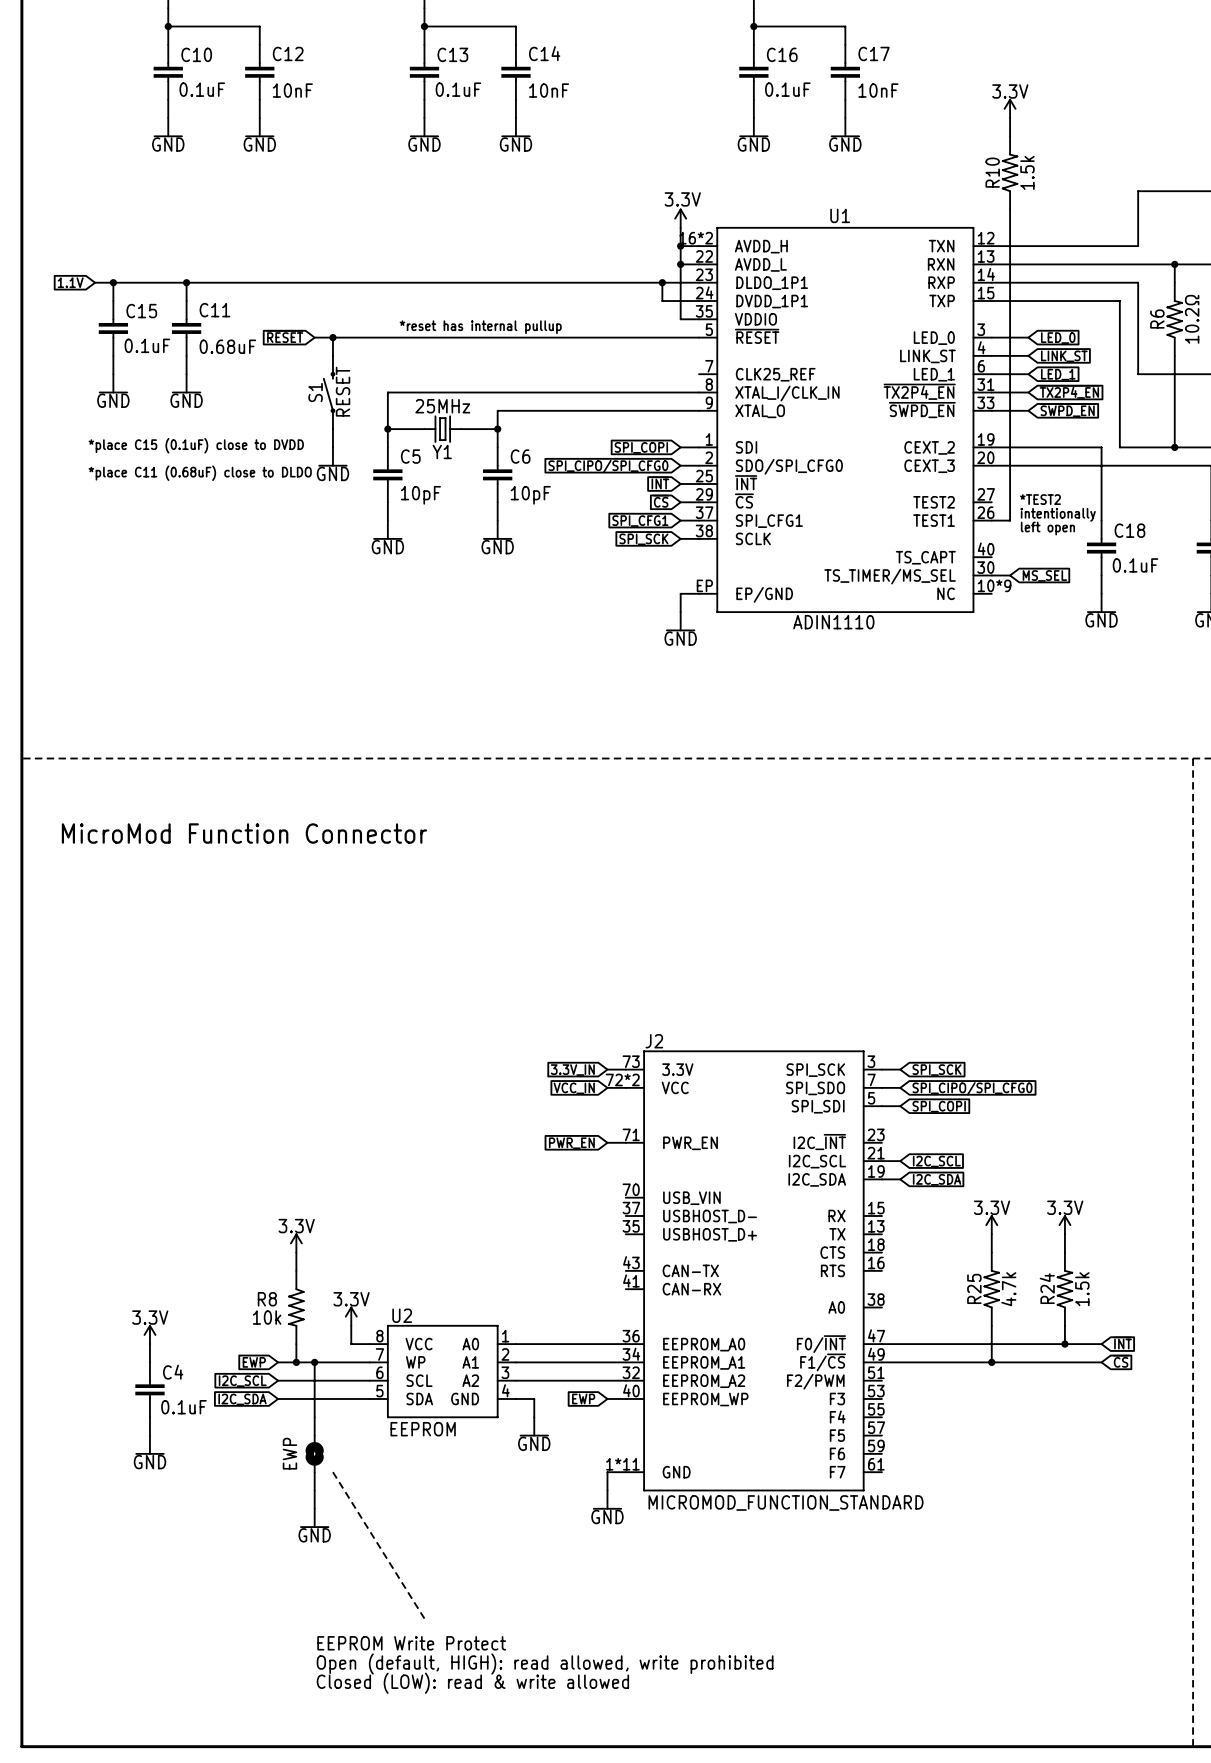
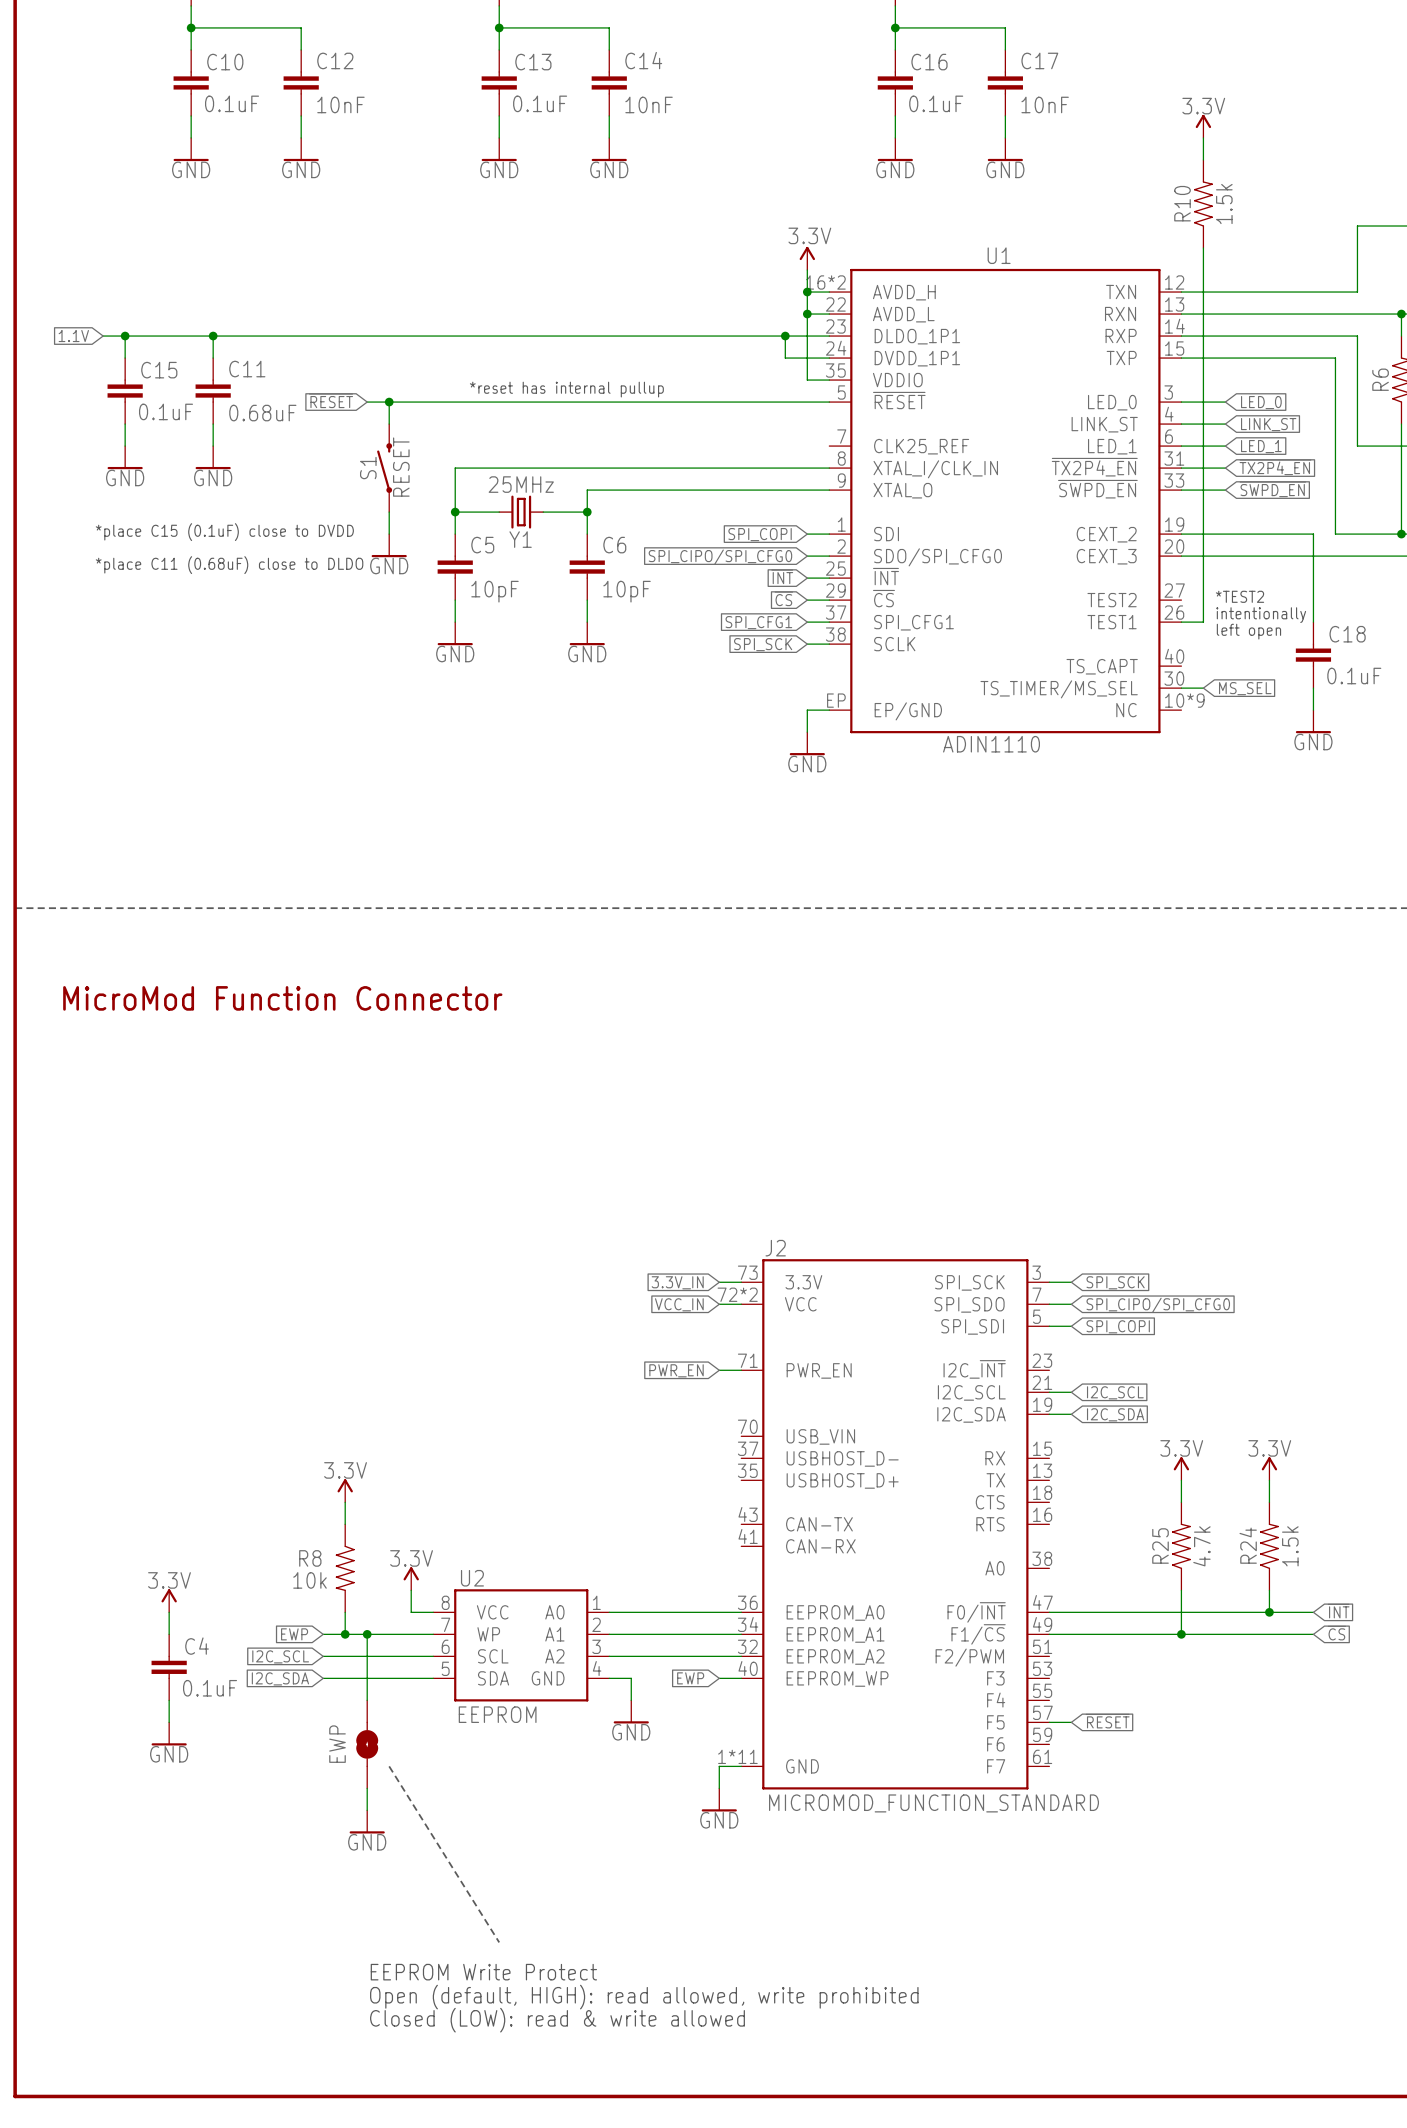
global label: none -> ~{RESET} (1107, 1721)
wire: none -> (1049, 1722) (1071, 1722)

